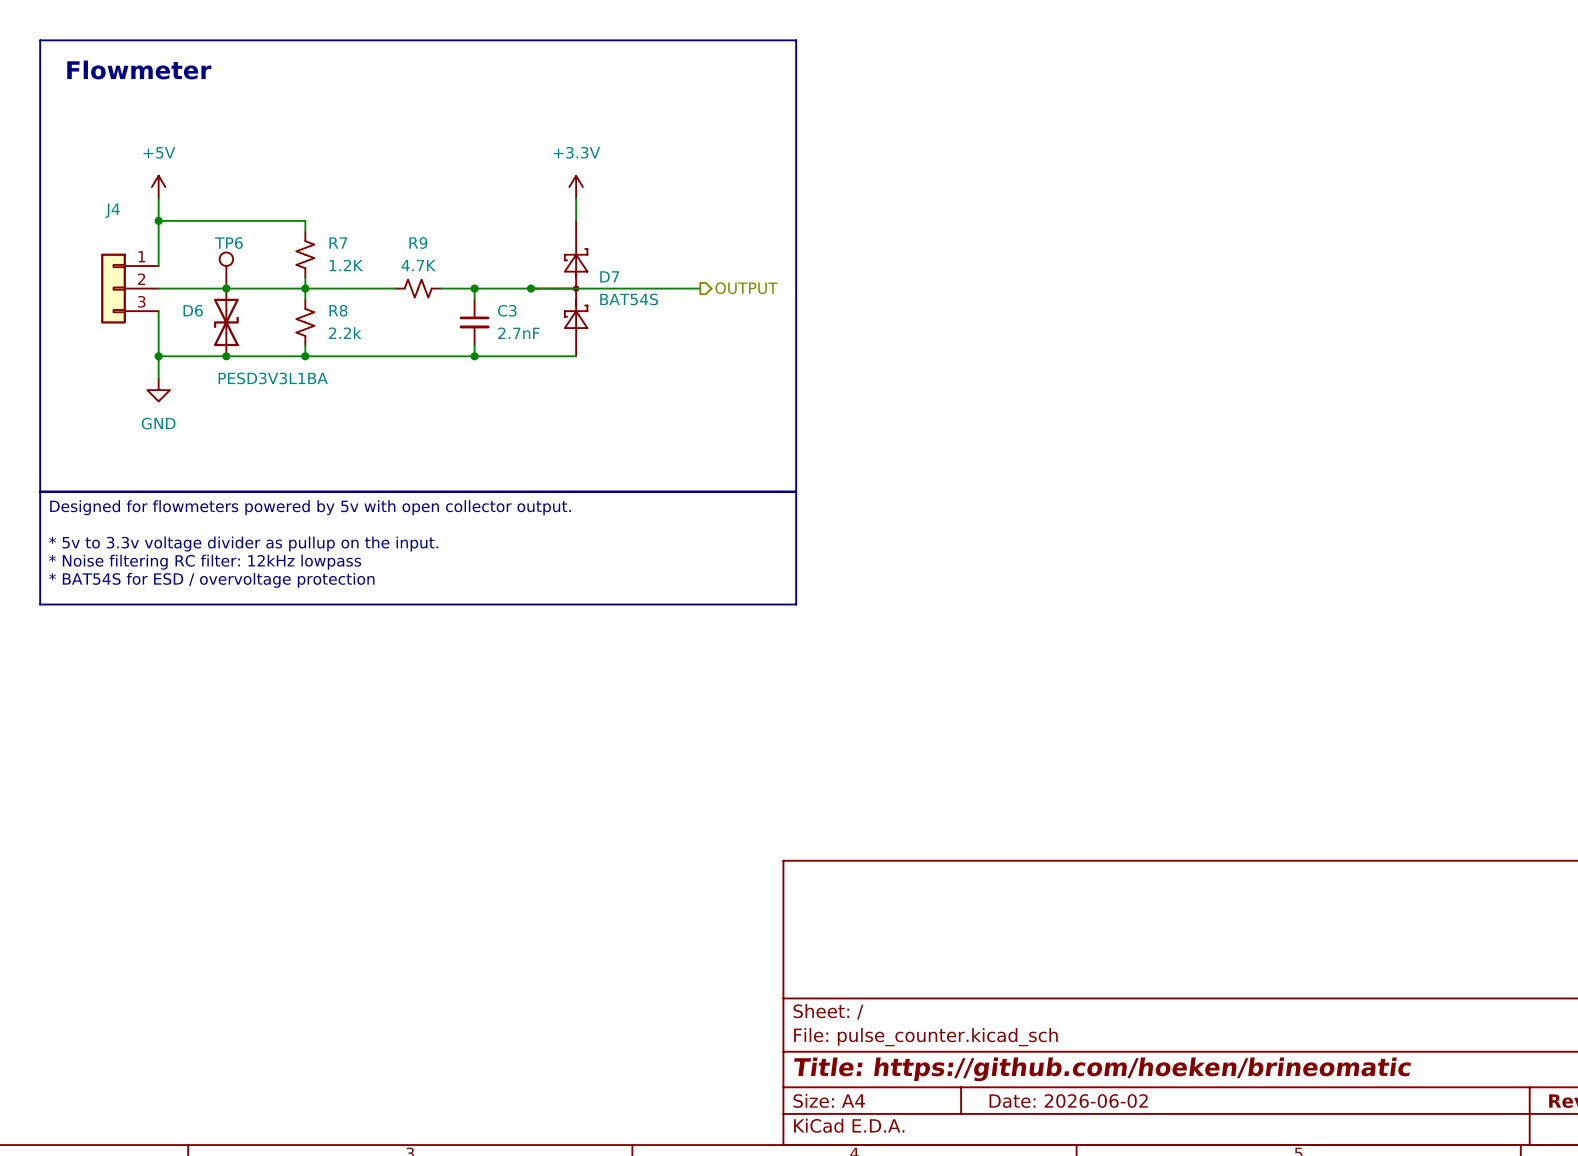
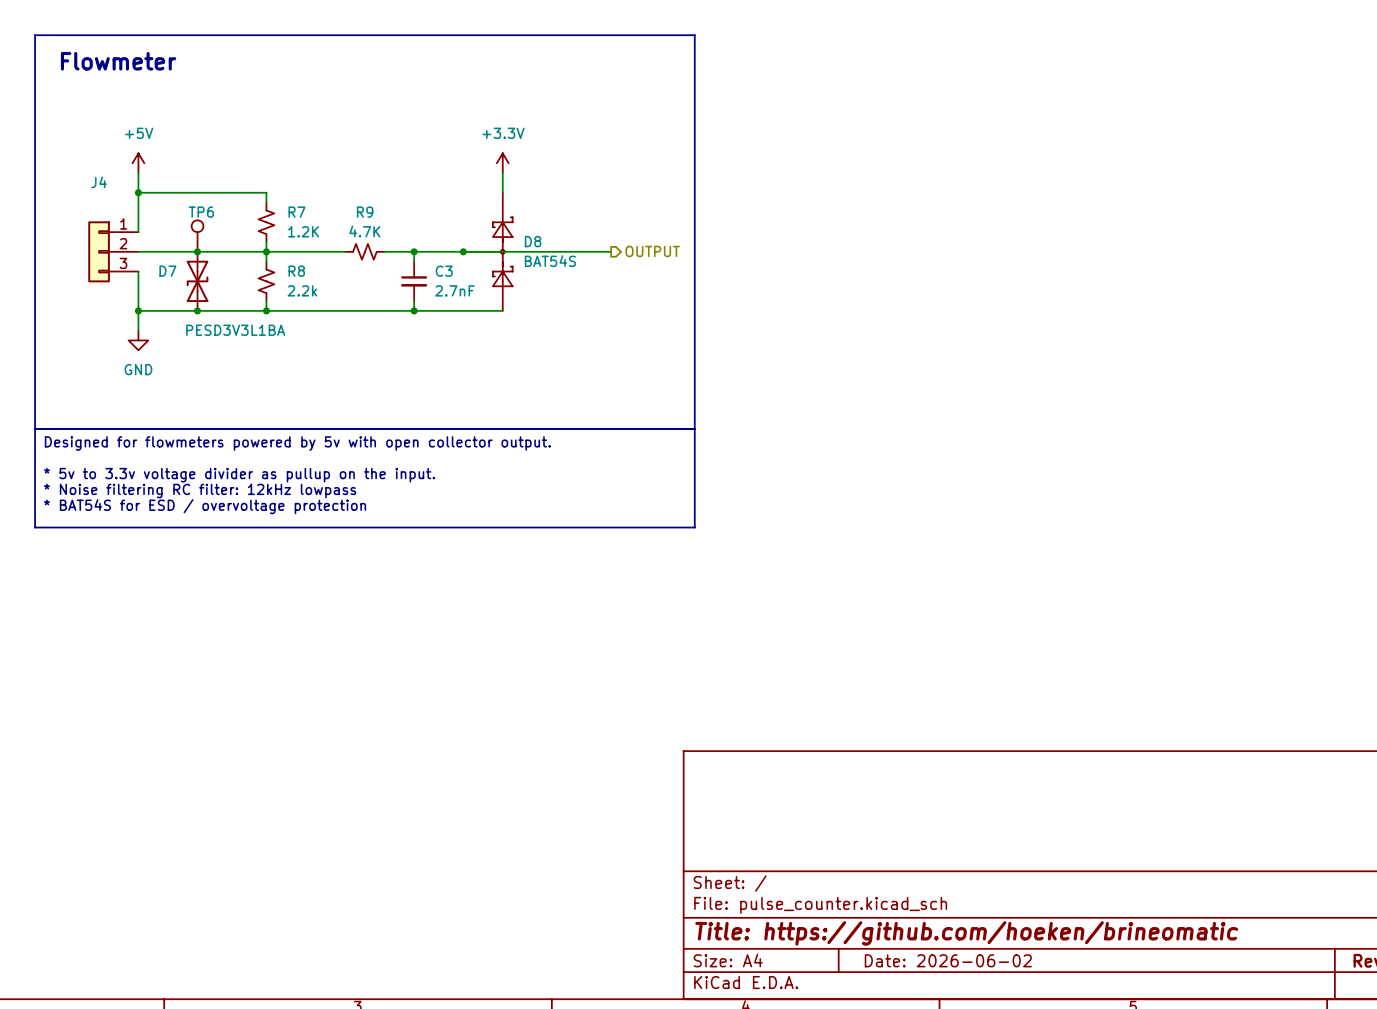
D7 name: D7 (609, 276) -> D8 (533, 241)
D6 name: D6 (193, 310) -> D7 (167, 271)

